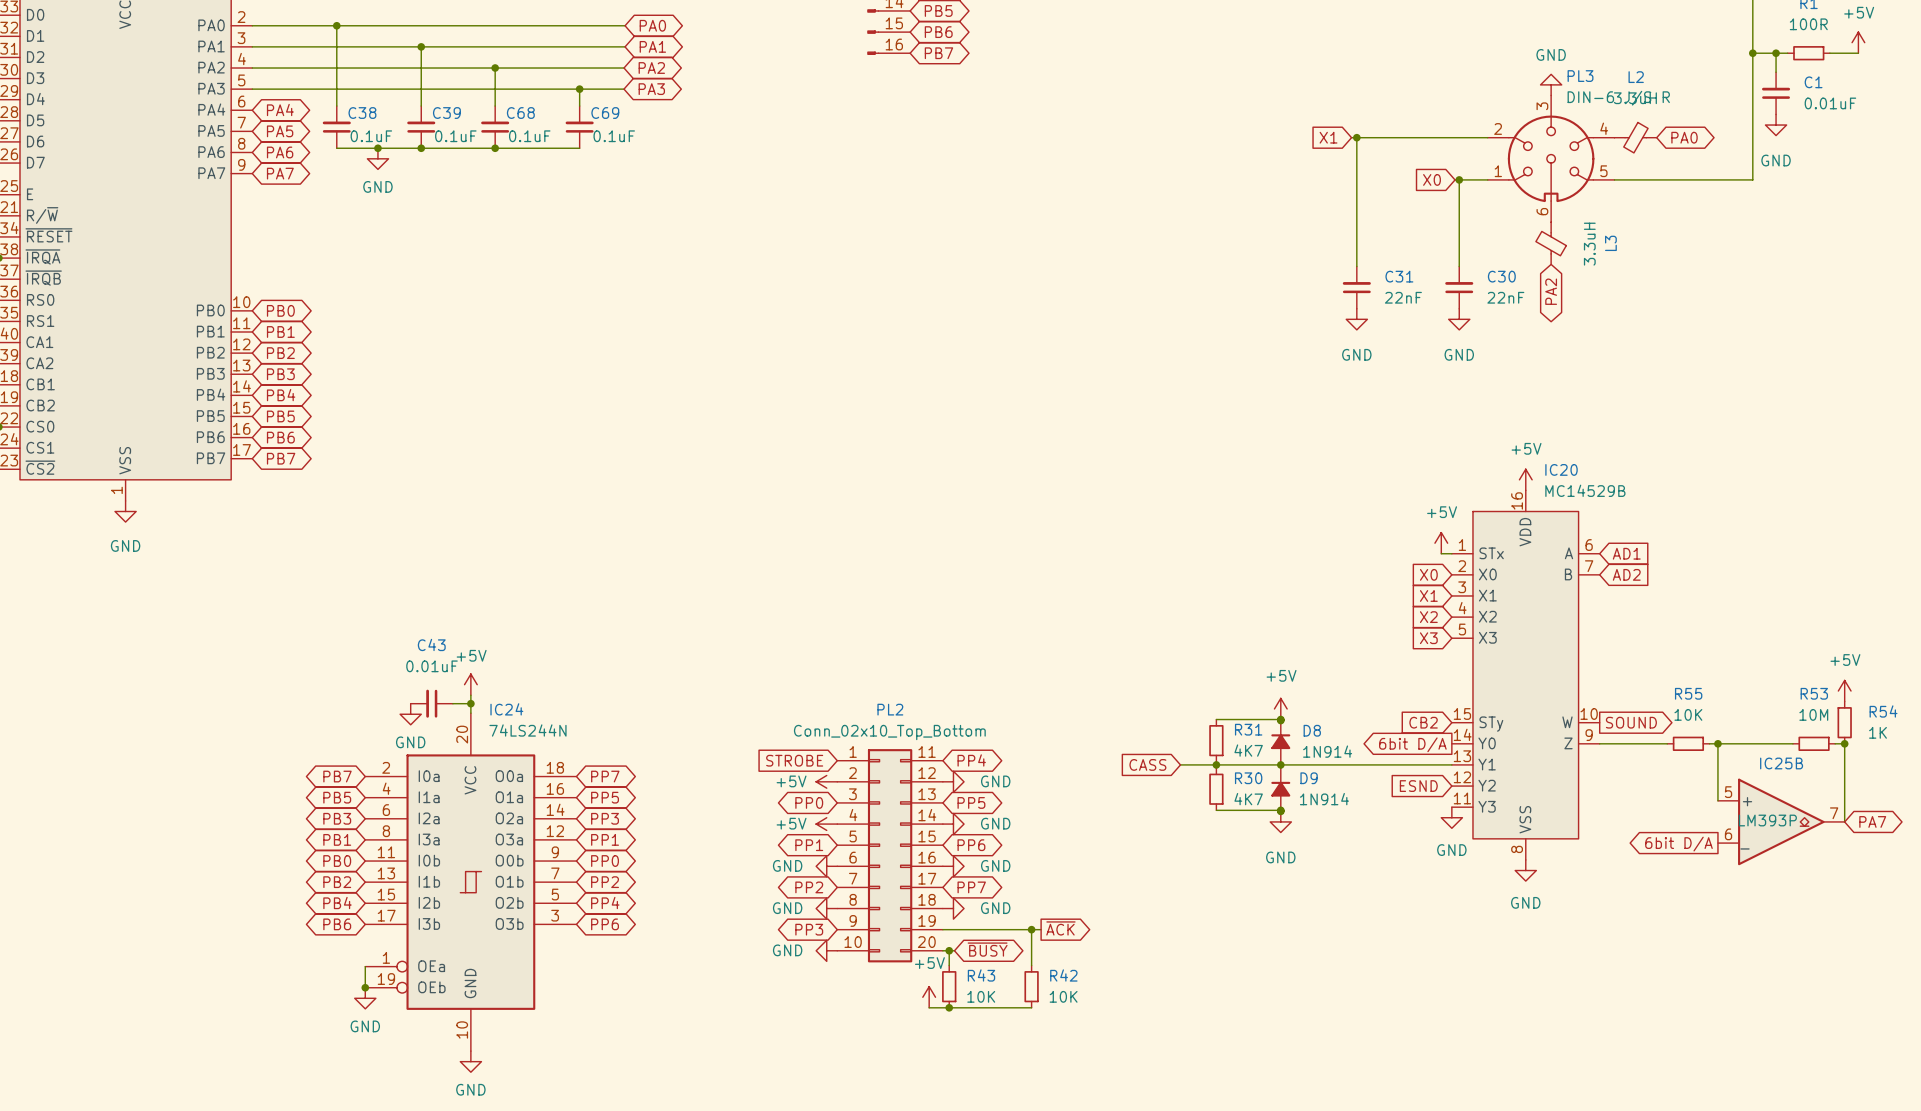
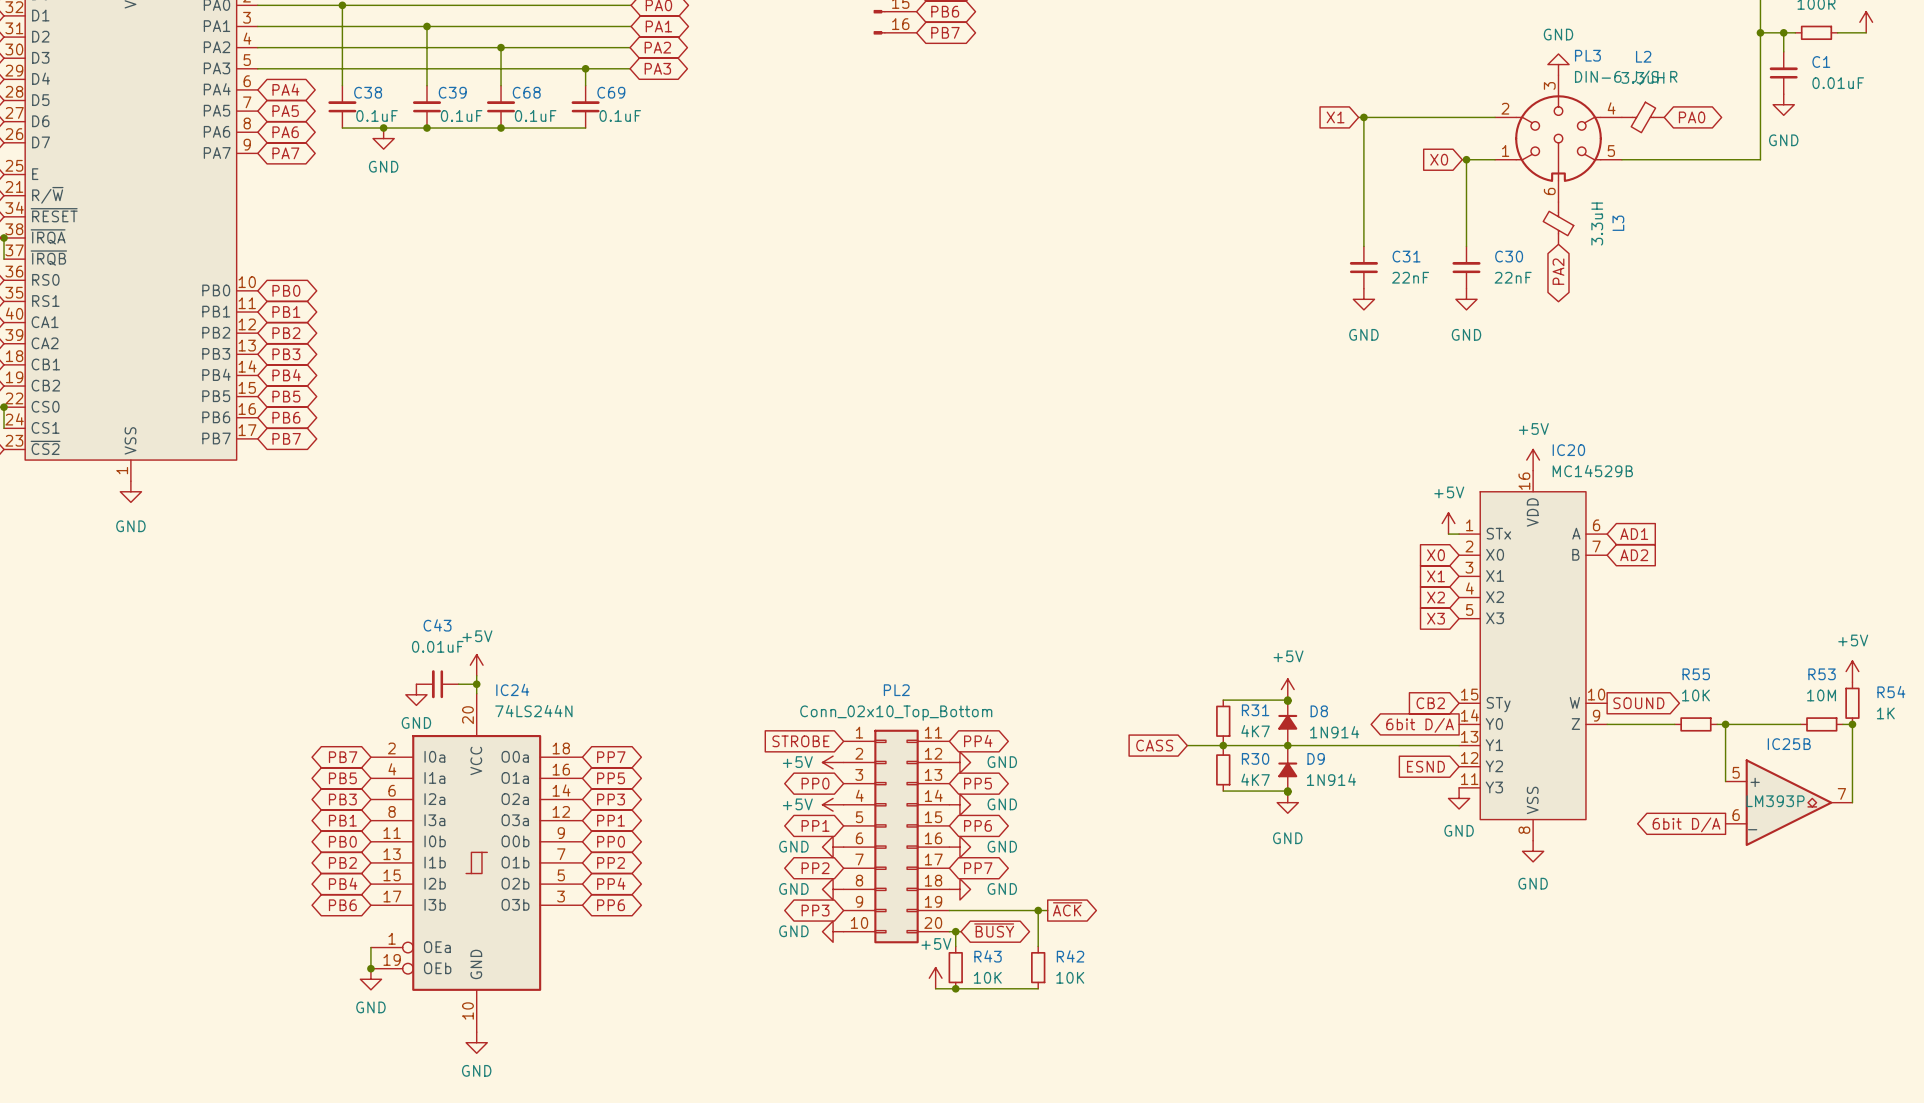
global label: PA7 (1872, 821) -> none

